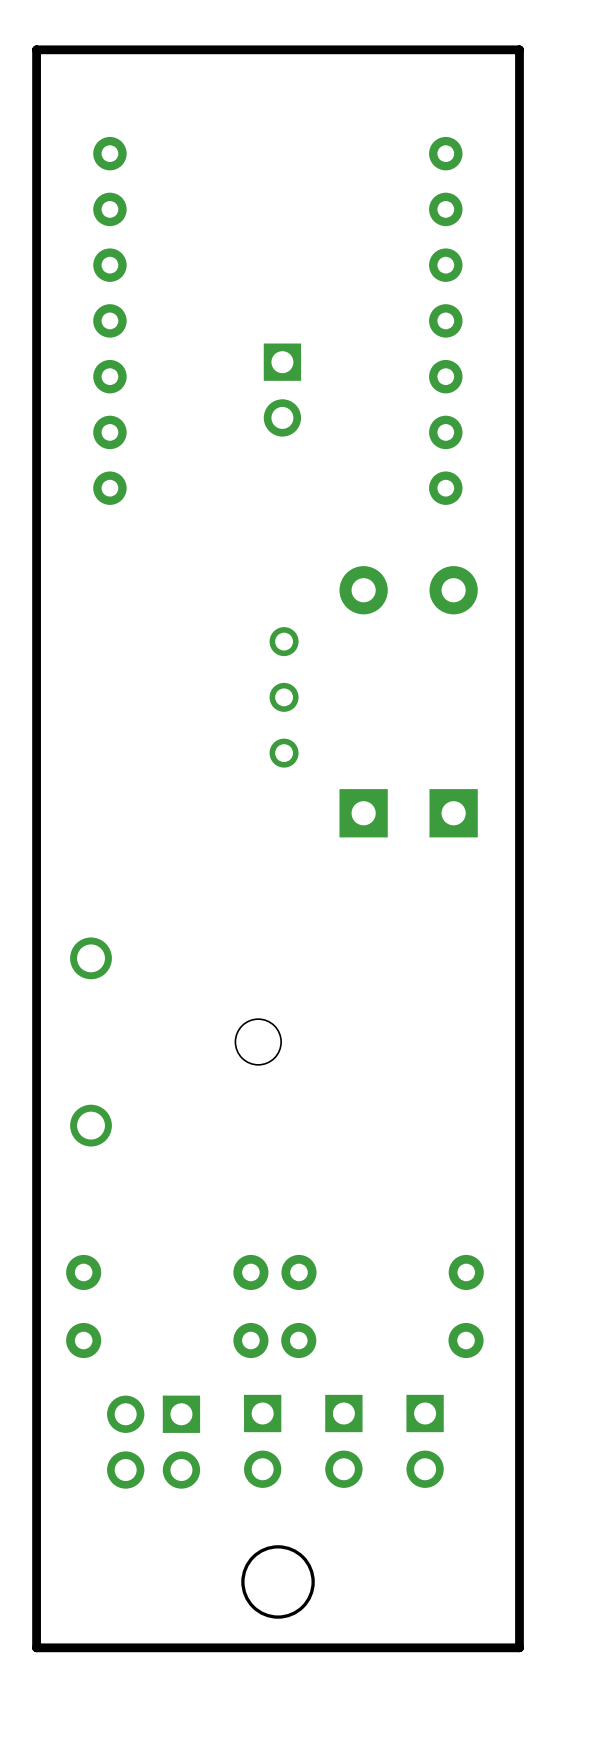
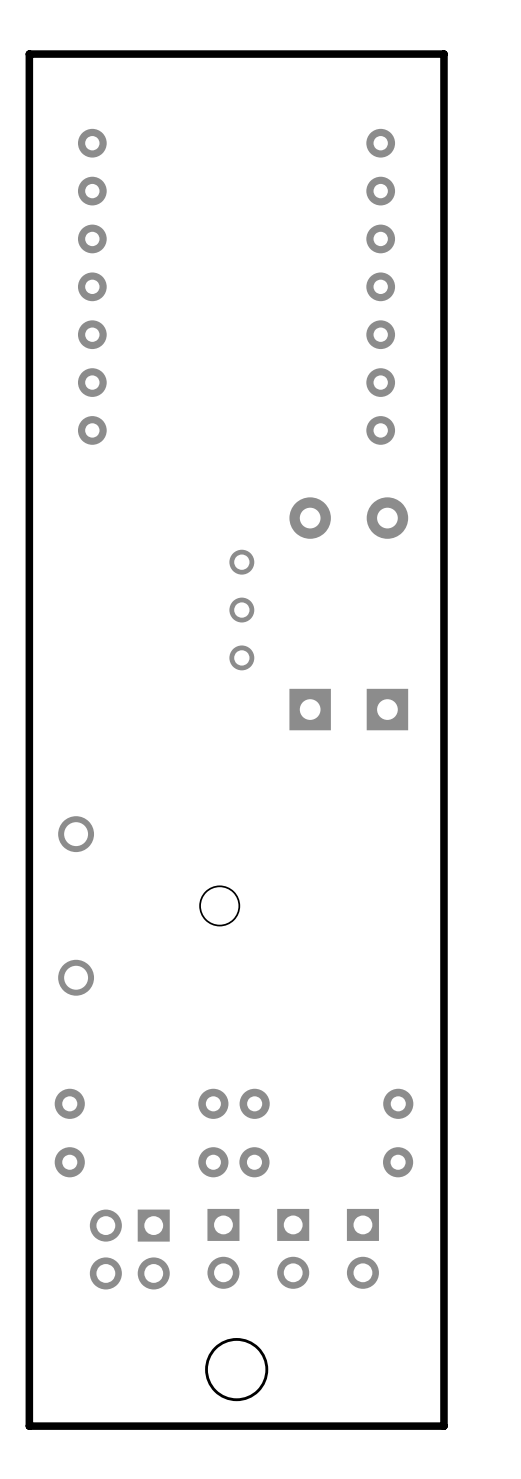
part: (282, 390) -> none

